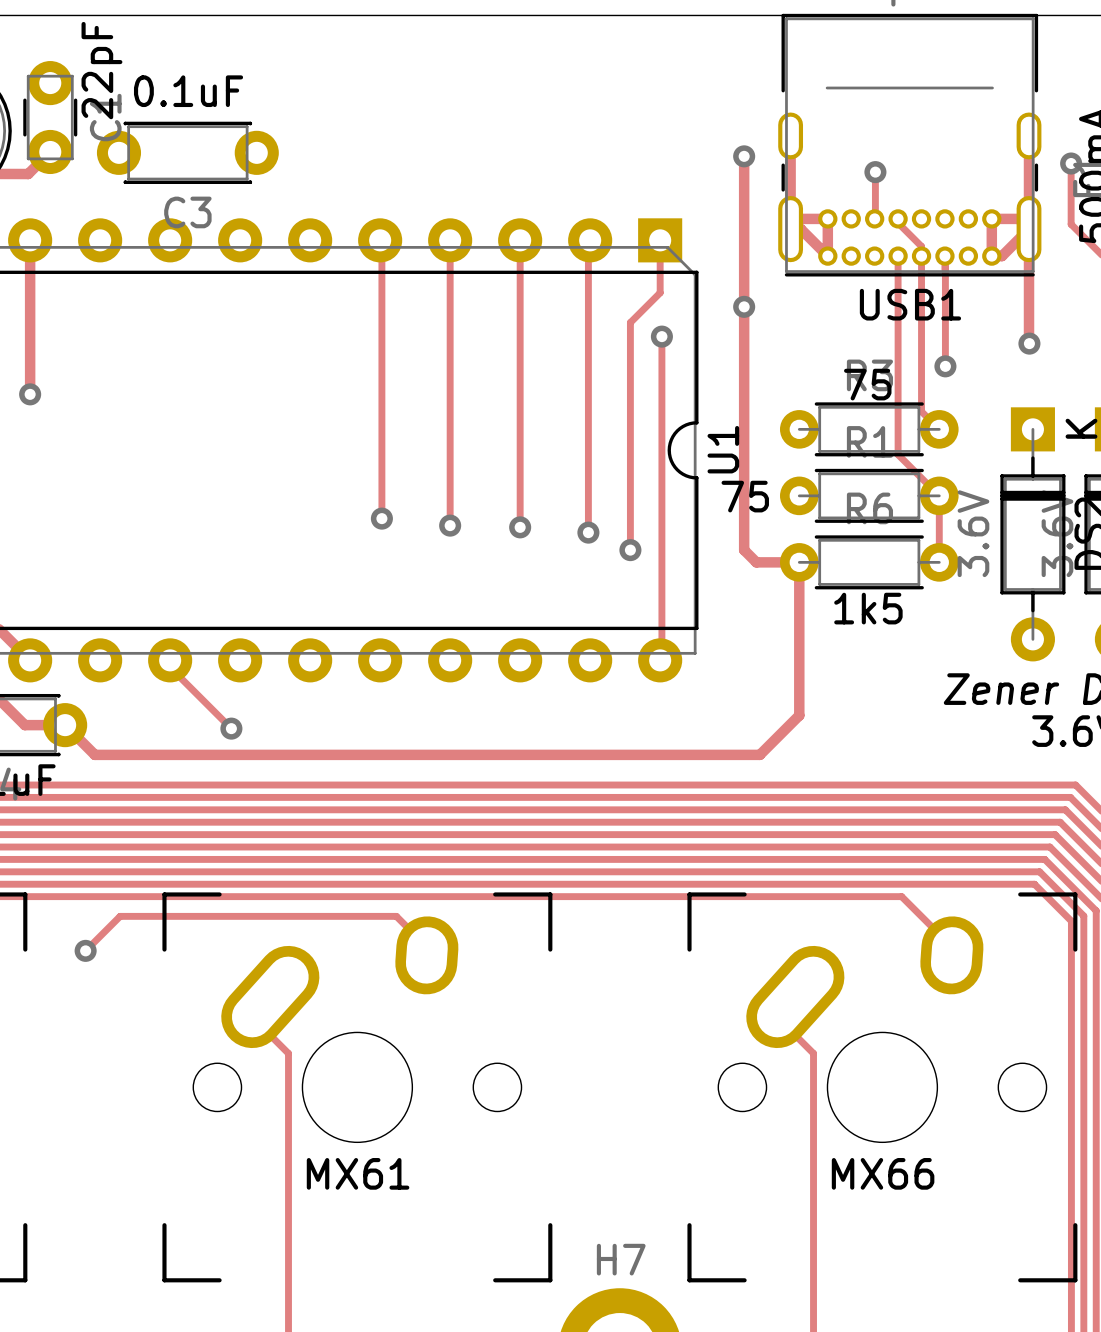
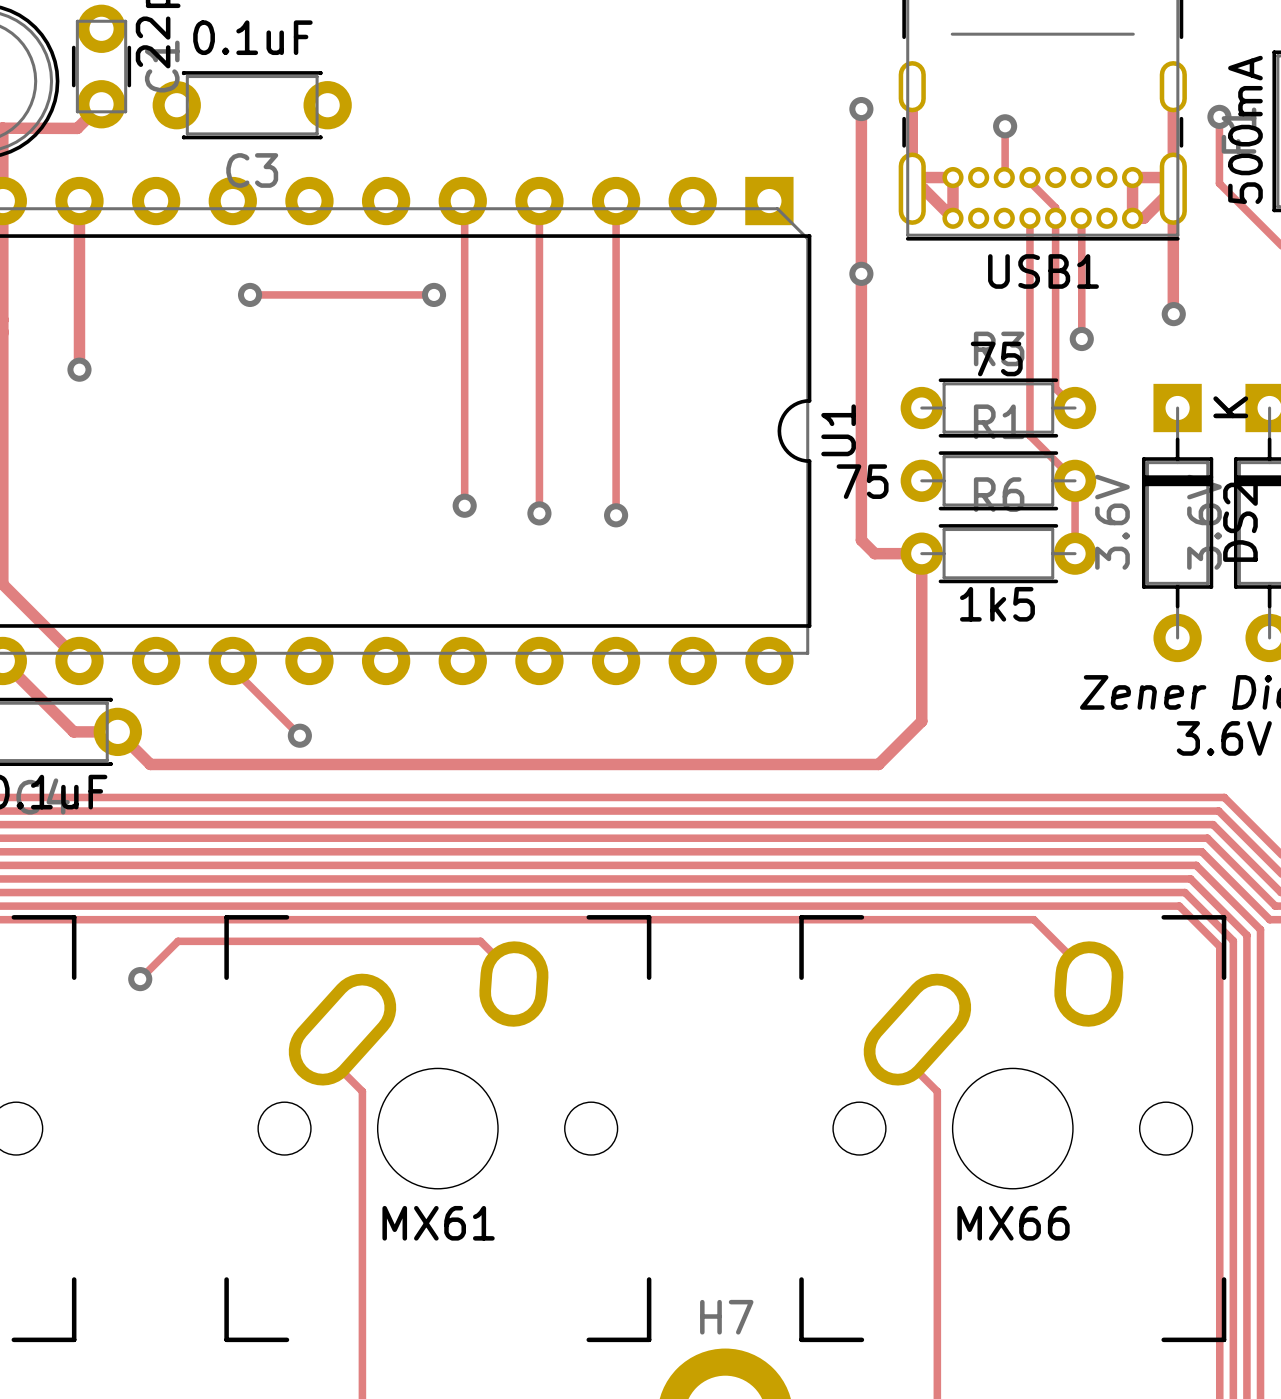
track: (590, 240) (588, 242) (588, 532) -> none
track: (660, 240) (660, 292) (630, 322) (630, 550) -> none
track: none -> (250, 294) (434, 294)
via: none -> (250, 294)
via: none -> (434, 294)
track: (661, 336) (661, 658) (660, 660) -> none
via: (661, 336) -> none
via: (588, 532) -> none
via: (630, 550) -> none

